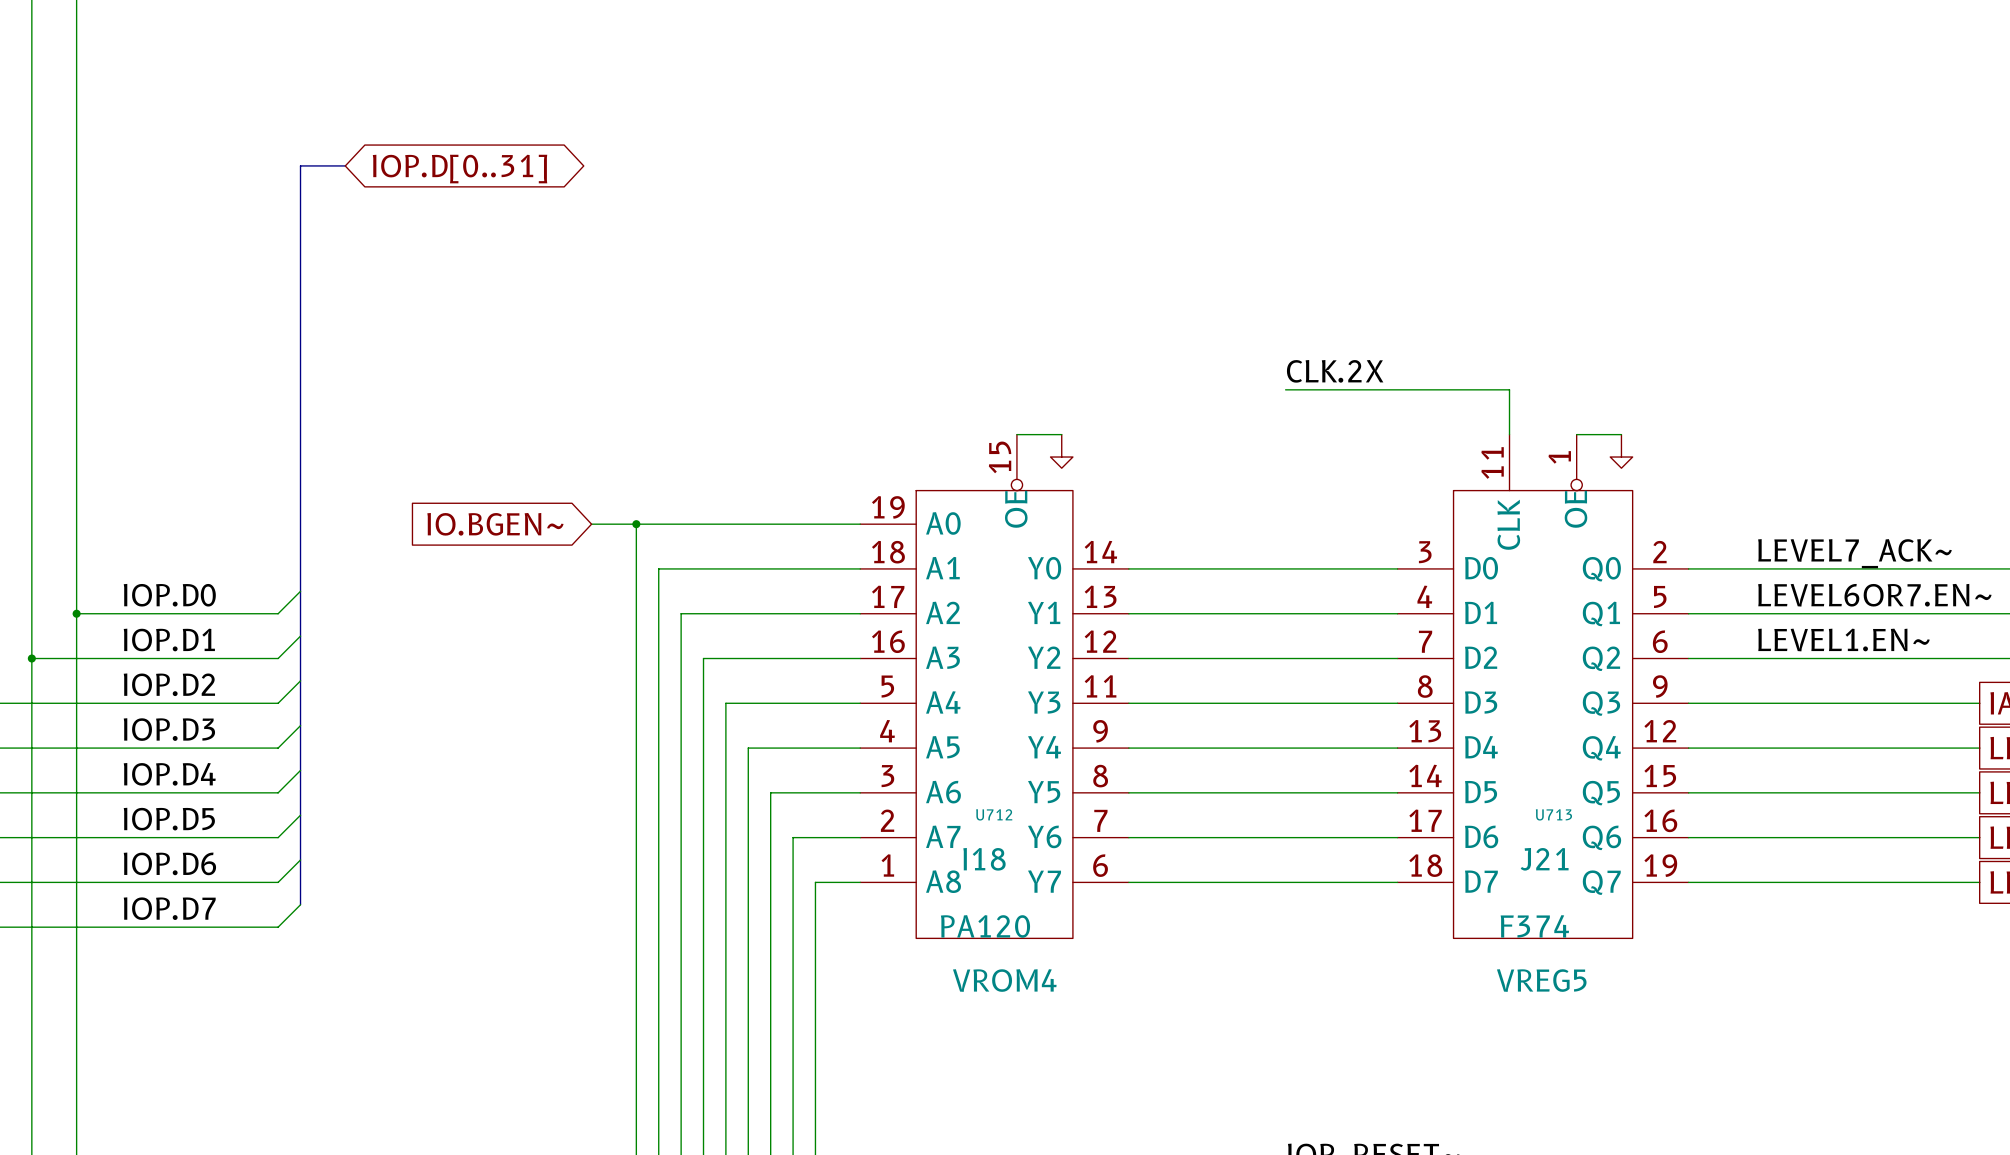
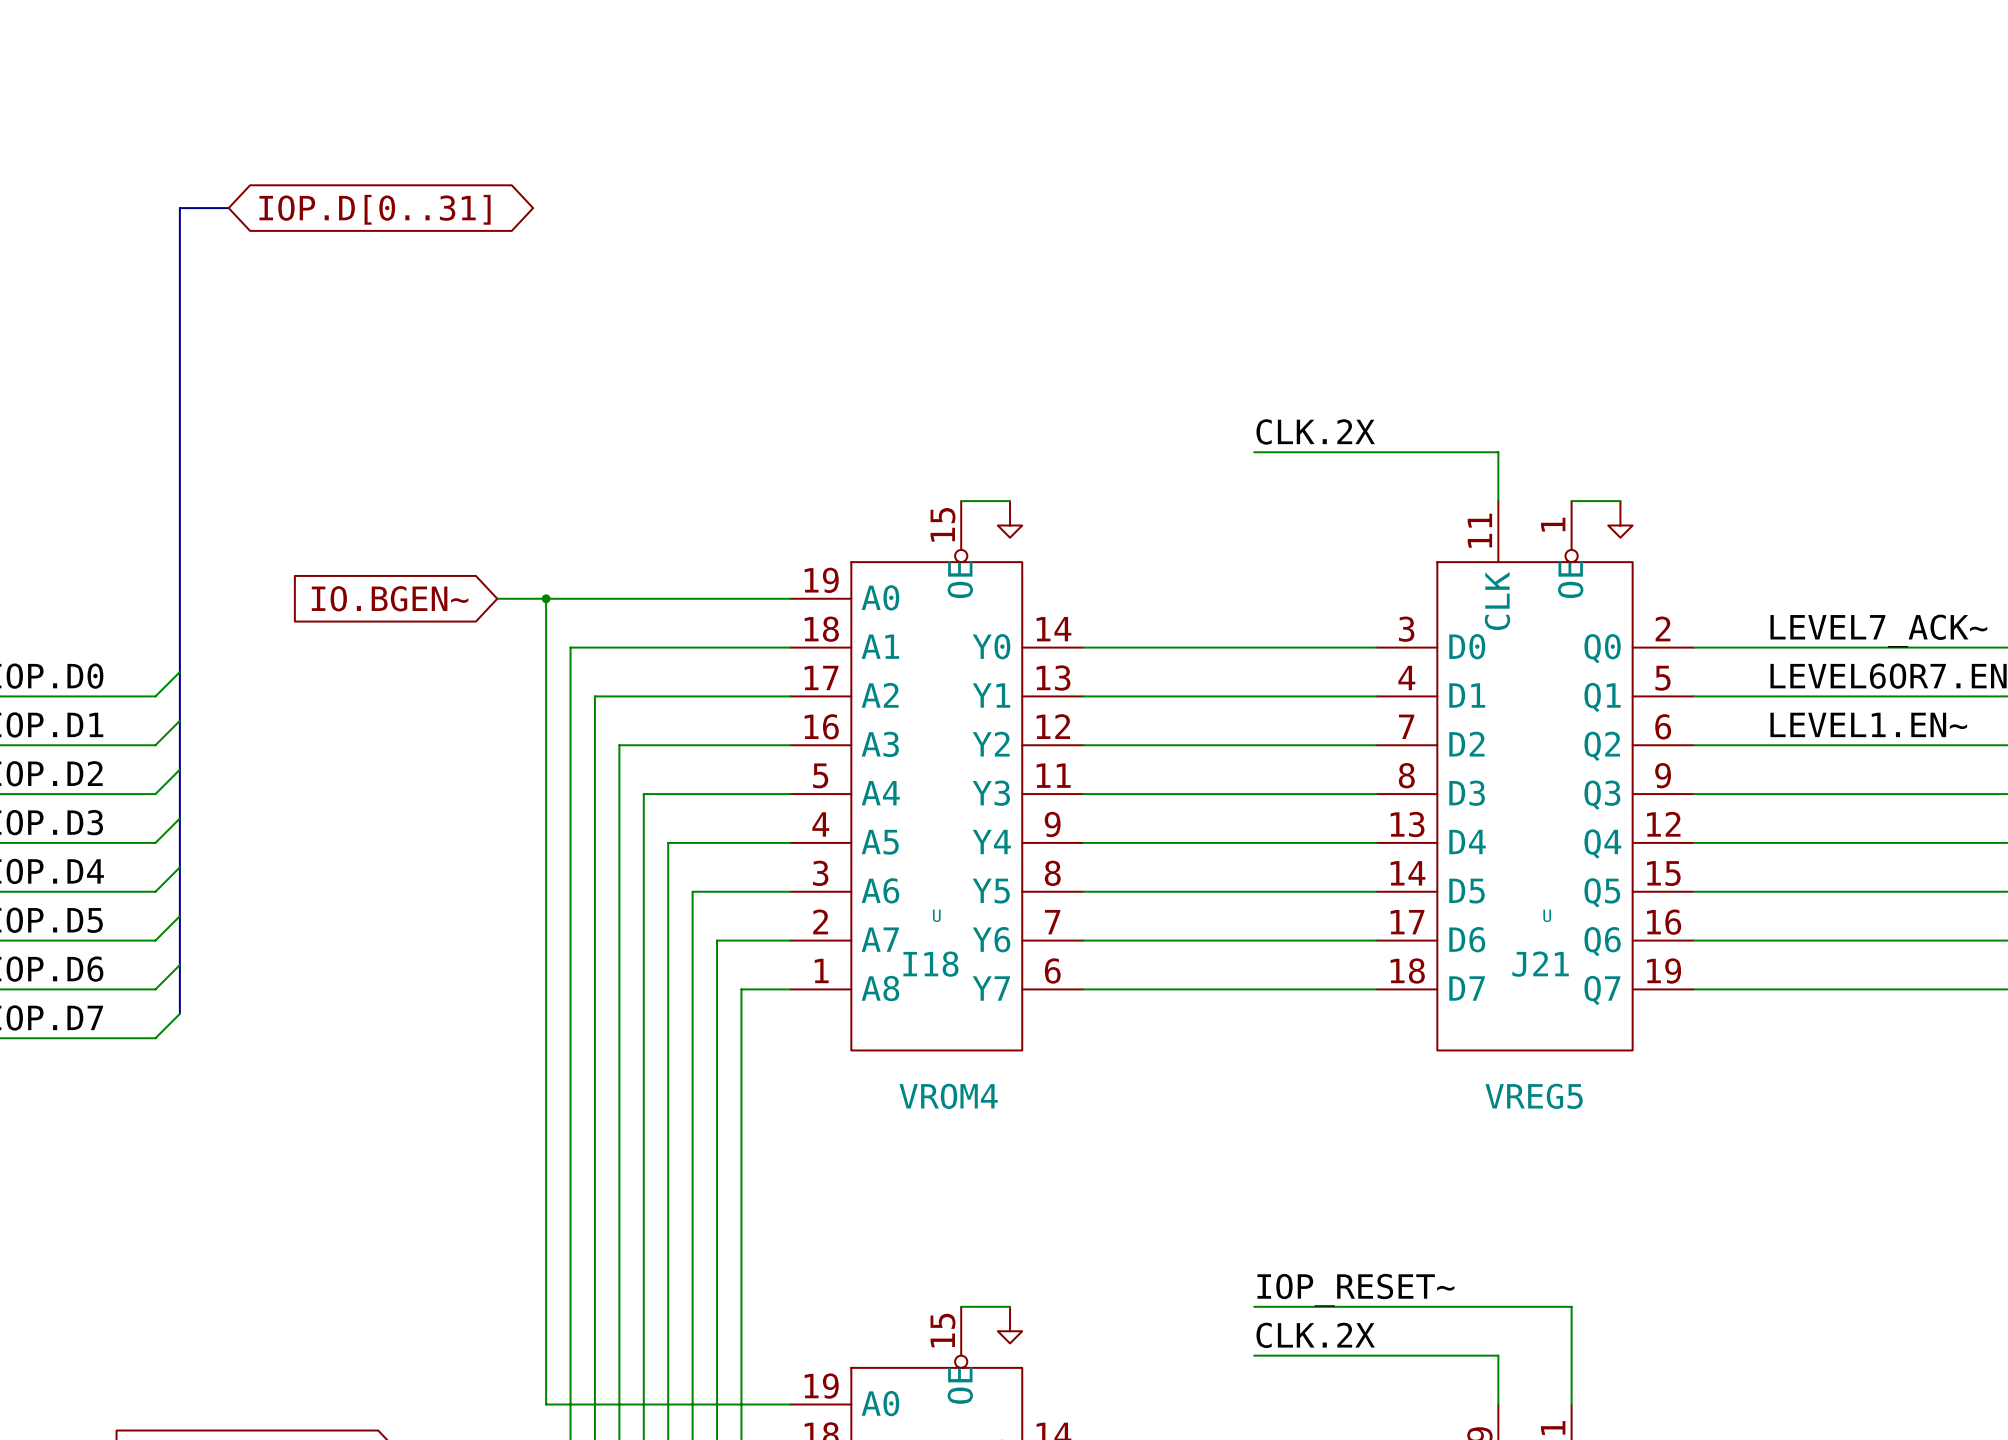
U712 name: U712 (994, 814) -> U (936, 915)
U713 name: U713 (1553, 814) -> U (1547, 915)
U712 value: PA120 (985, 926) -> none
U713 value: F374 (1534, 926) -> none

